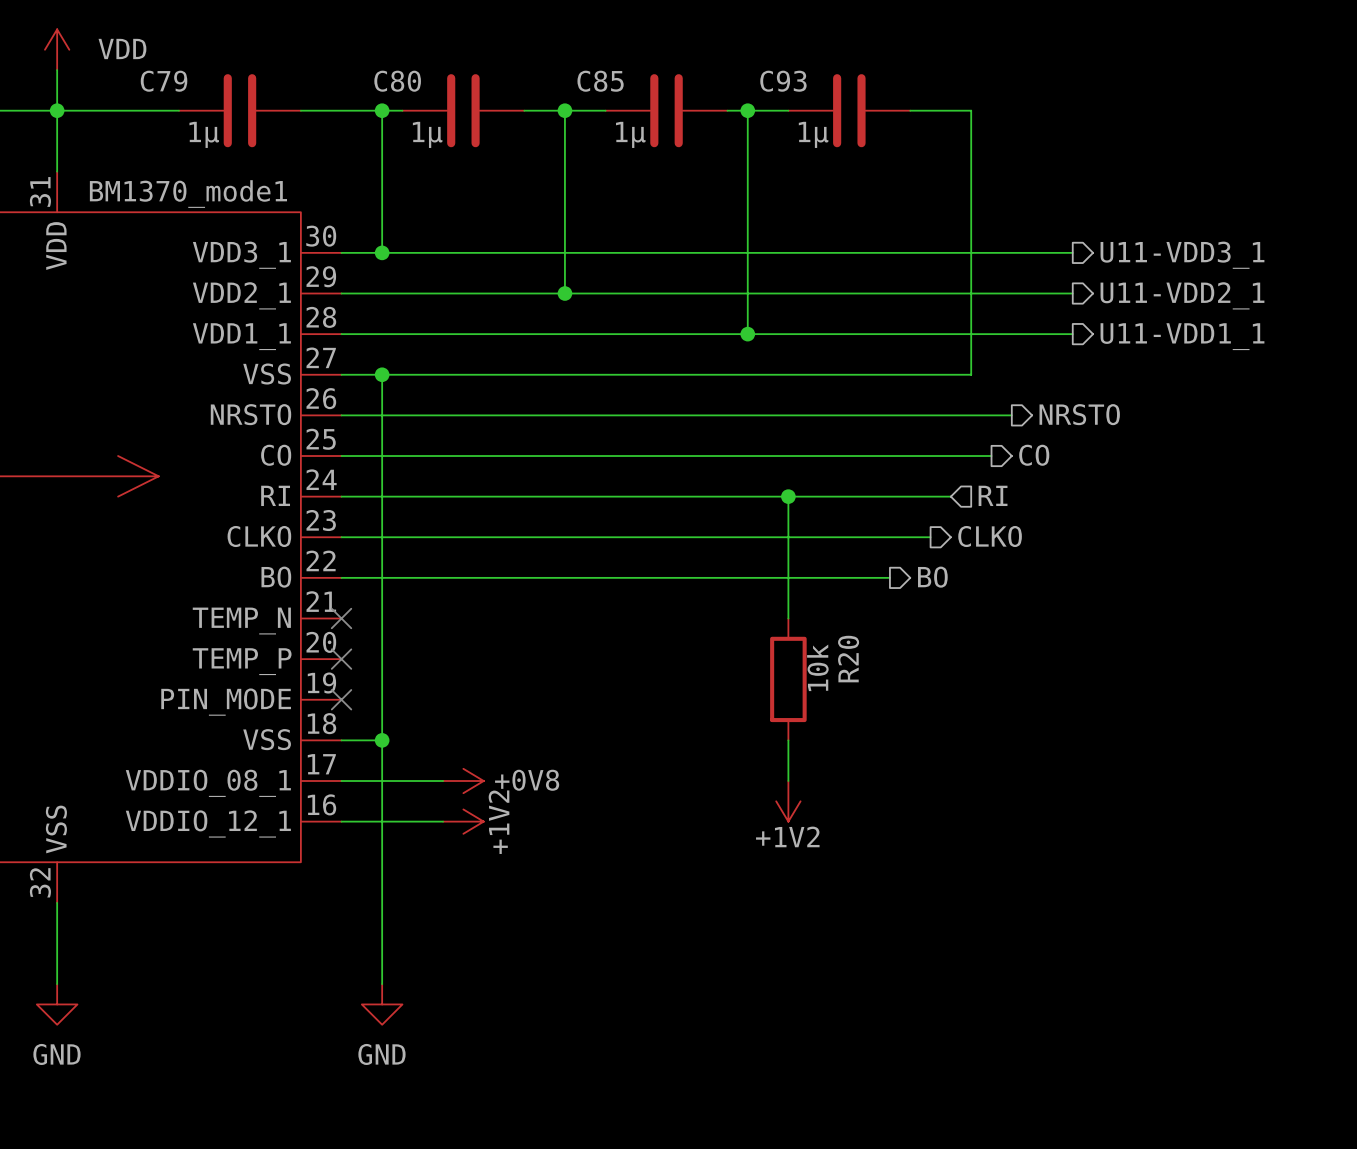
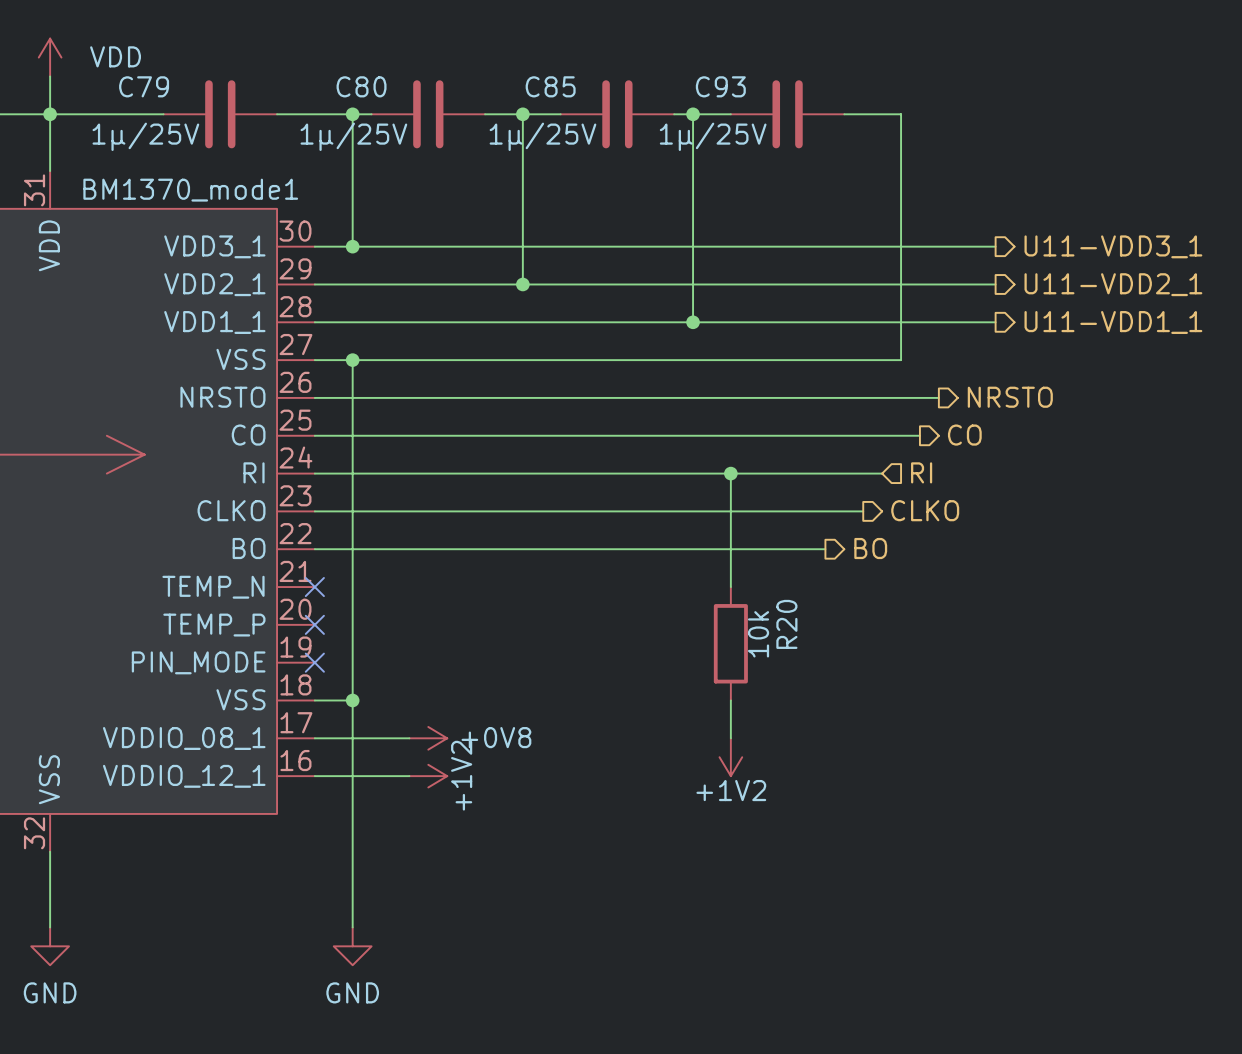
C79 value: 1µ (204, 134) -> 1µ/25V (145, 136)
C80 value: 1µ (427, 134) -> 1µ/25V (353, 136)
C85 value: 1µ (630, 134) -> 1µ/25V (542, 136)
C93 value: 1µ (813, 134) -> 1µ/25V (713, 136)

